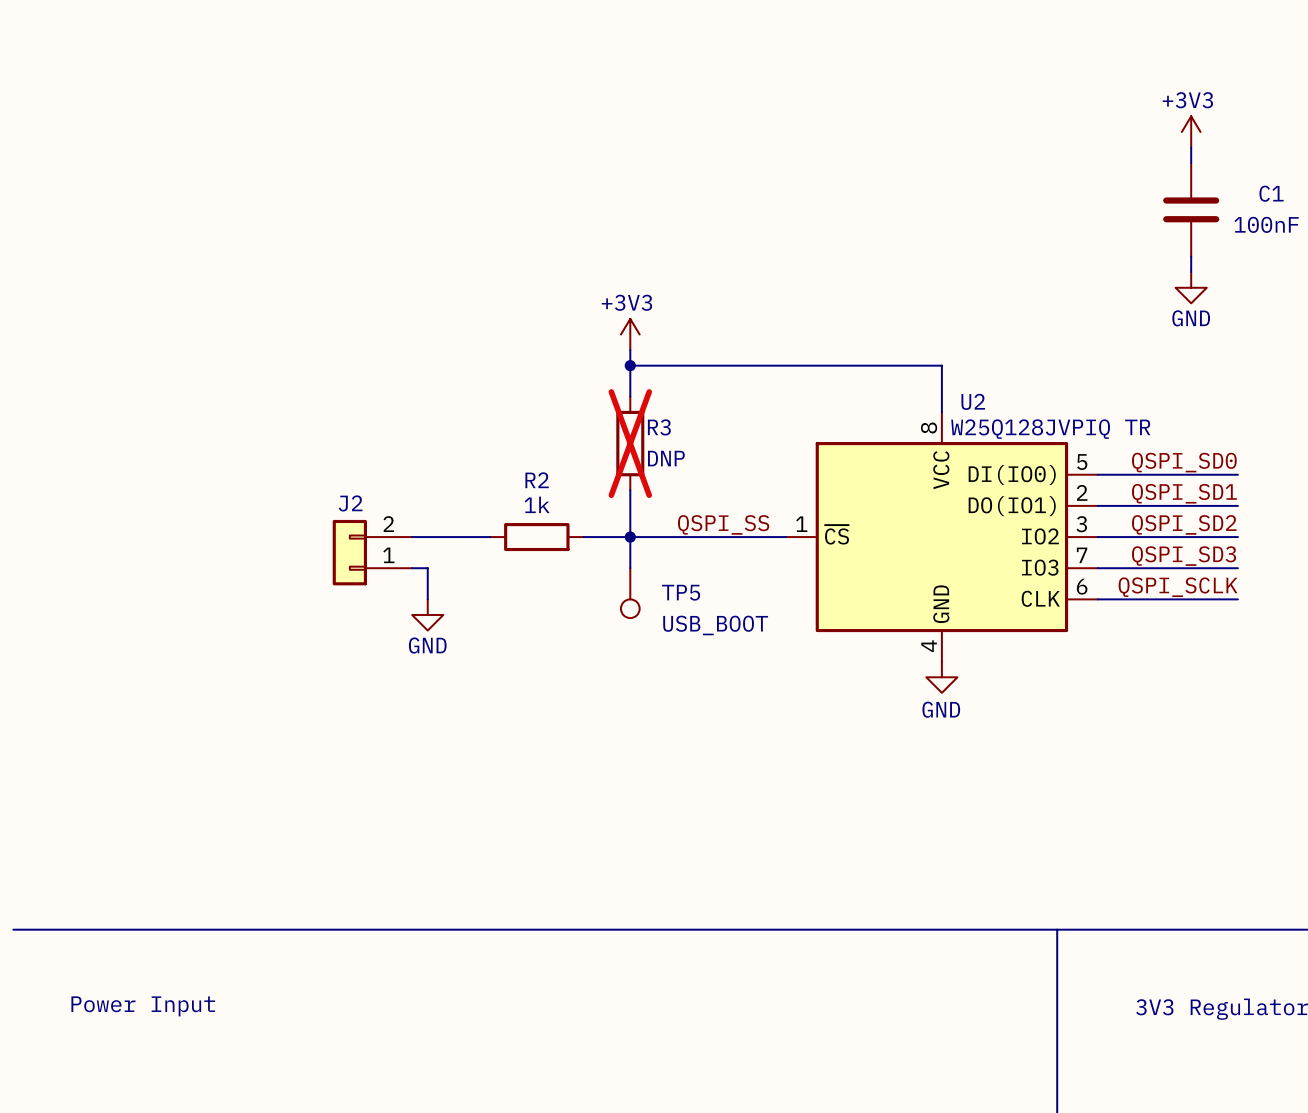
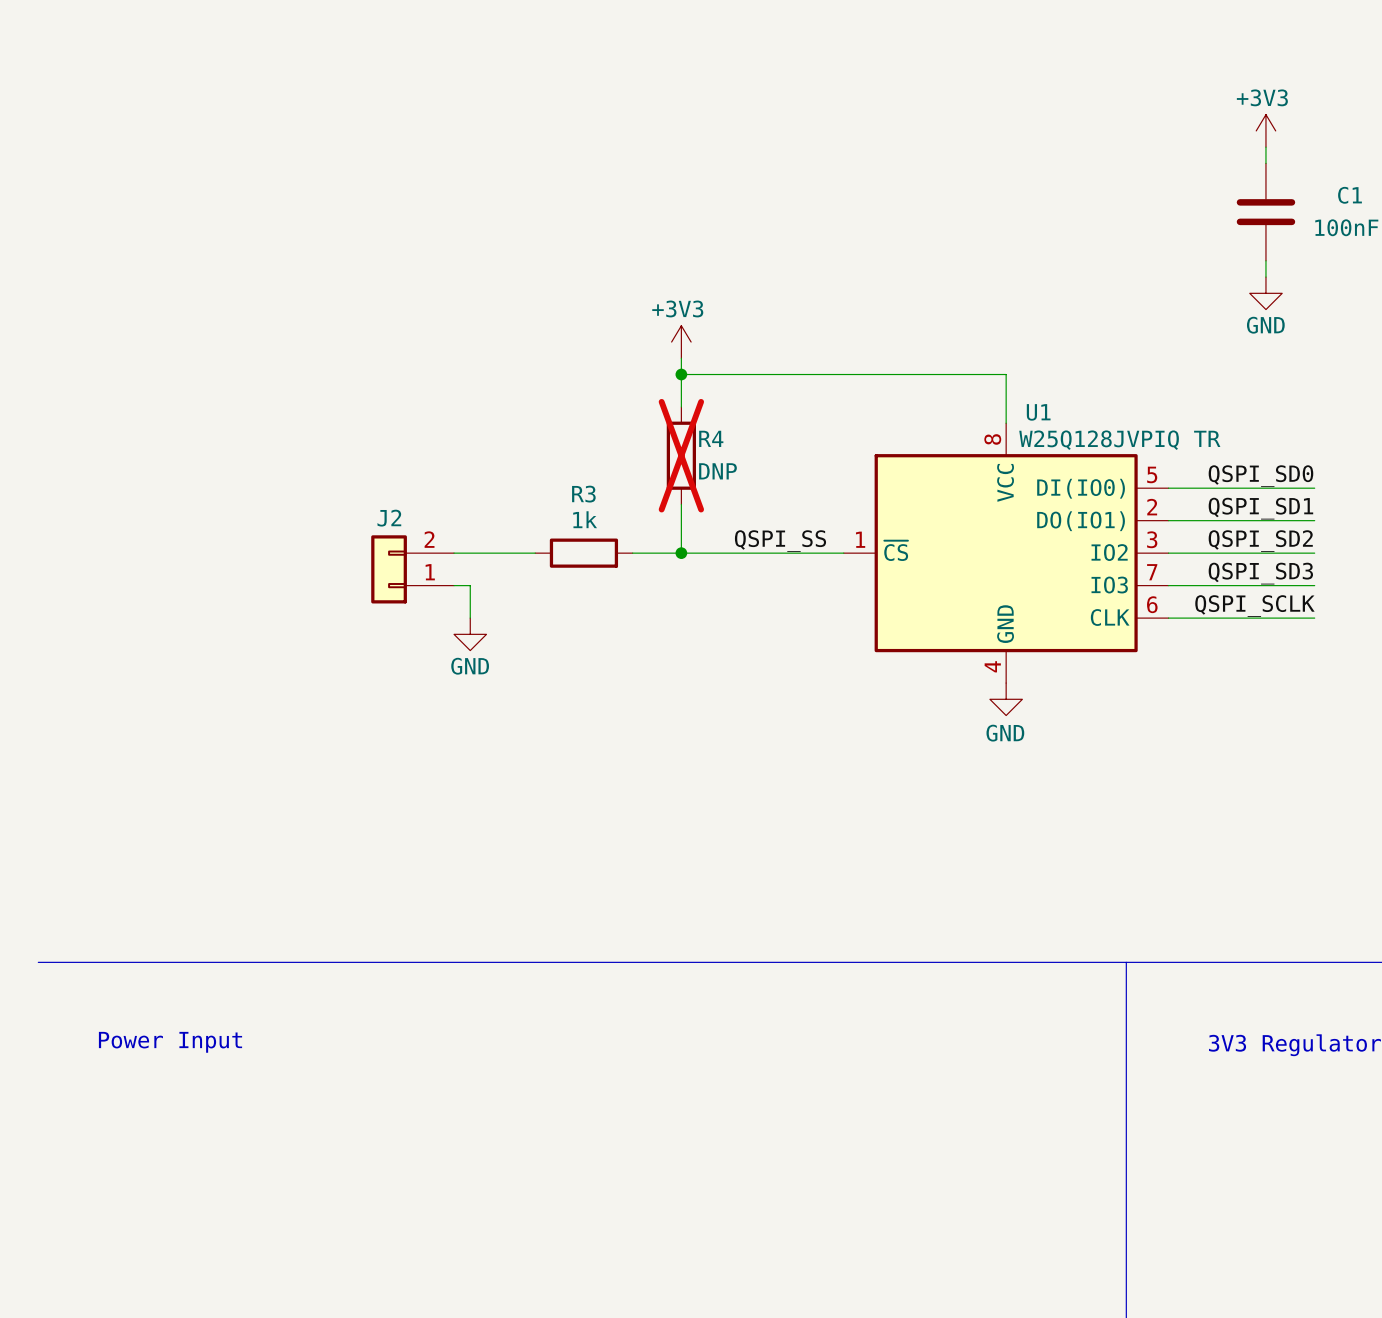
U2 name: U2 (973, 401) -> U1 (1038, 412)
R3 name: R3 (659, 427) -> R4 (711, 438)
R2 name: R2 (537, 480) -> R3 (583, 494)
wire: (630, 537) (630, 568) -> none
TP5: USB_BOOT (630, 593) -> none

